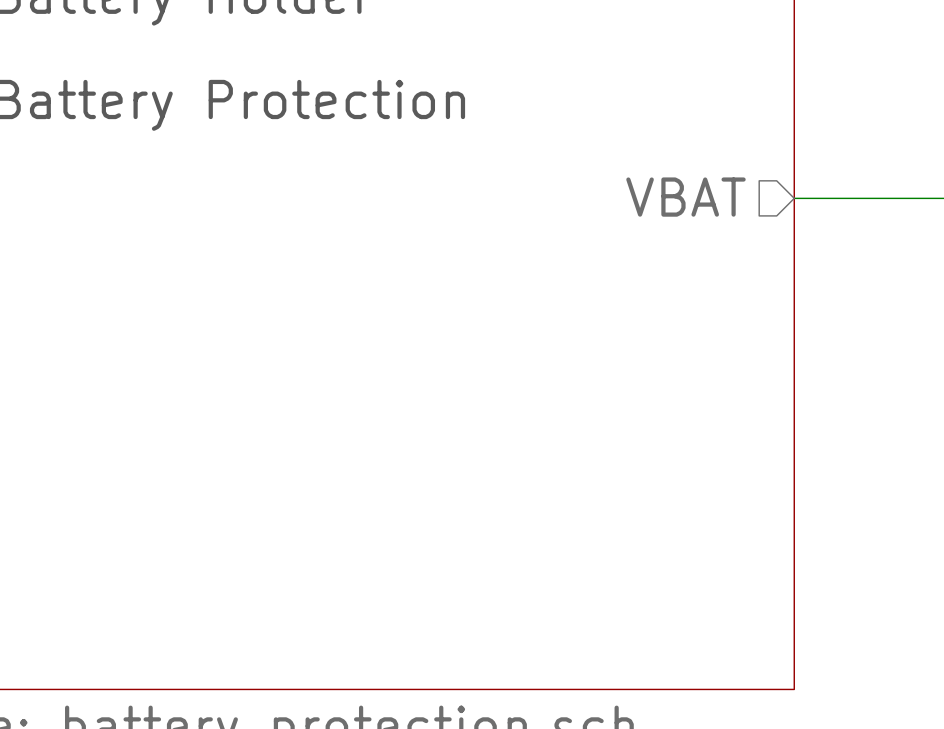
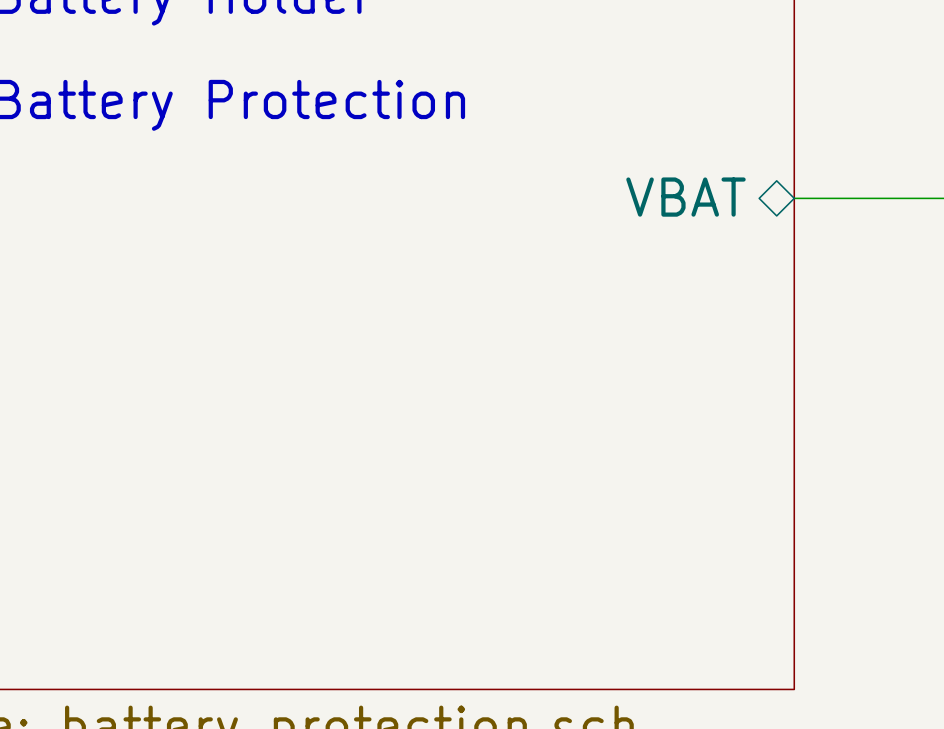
sheet pin shape: output (685, 197) -> bidirectional (685, 197)

